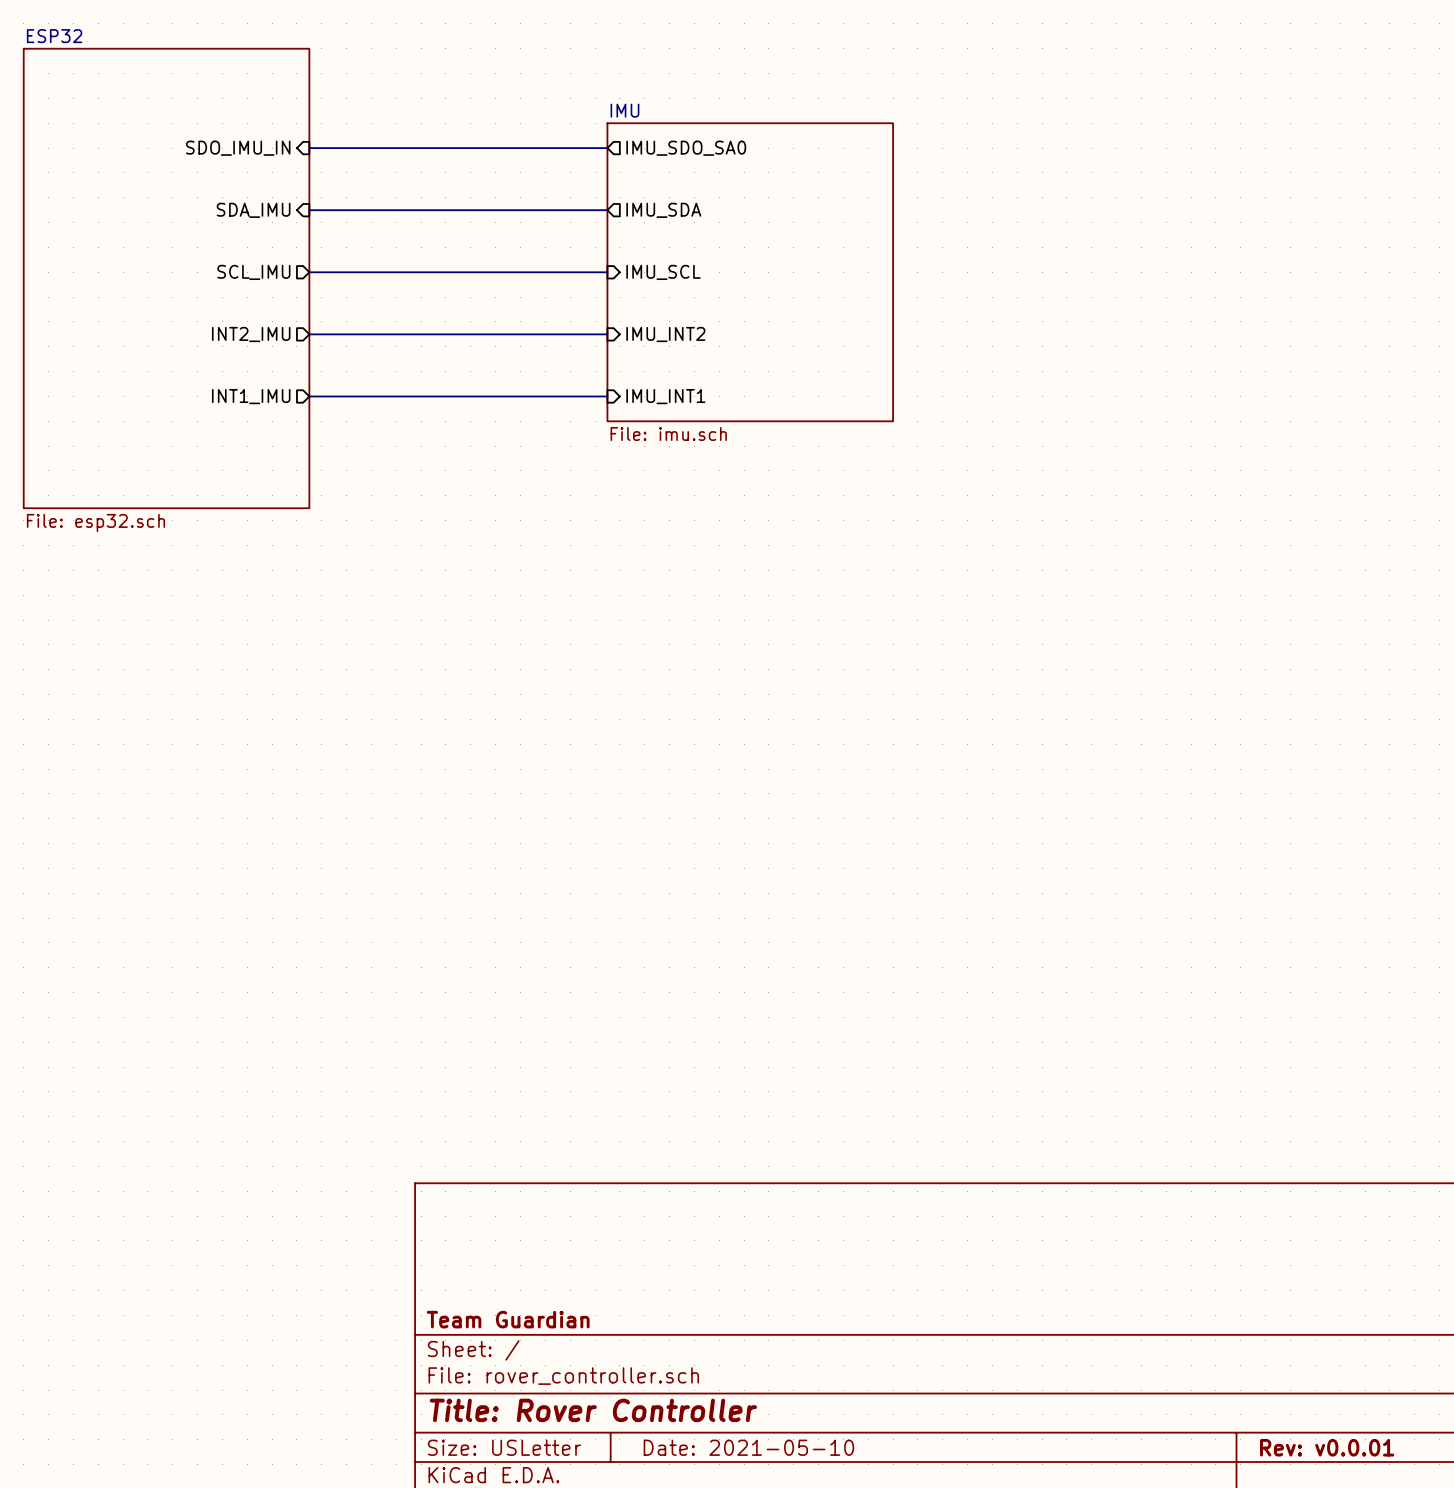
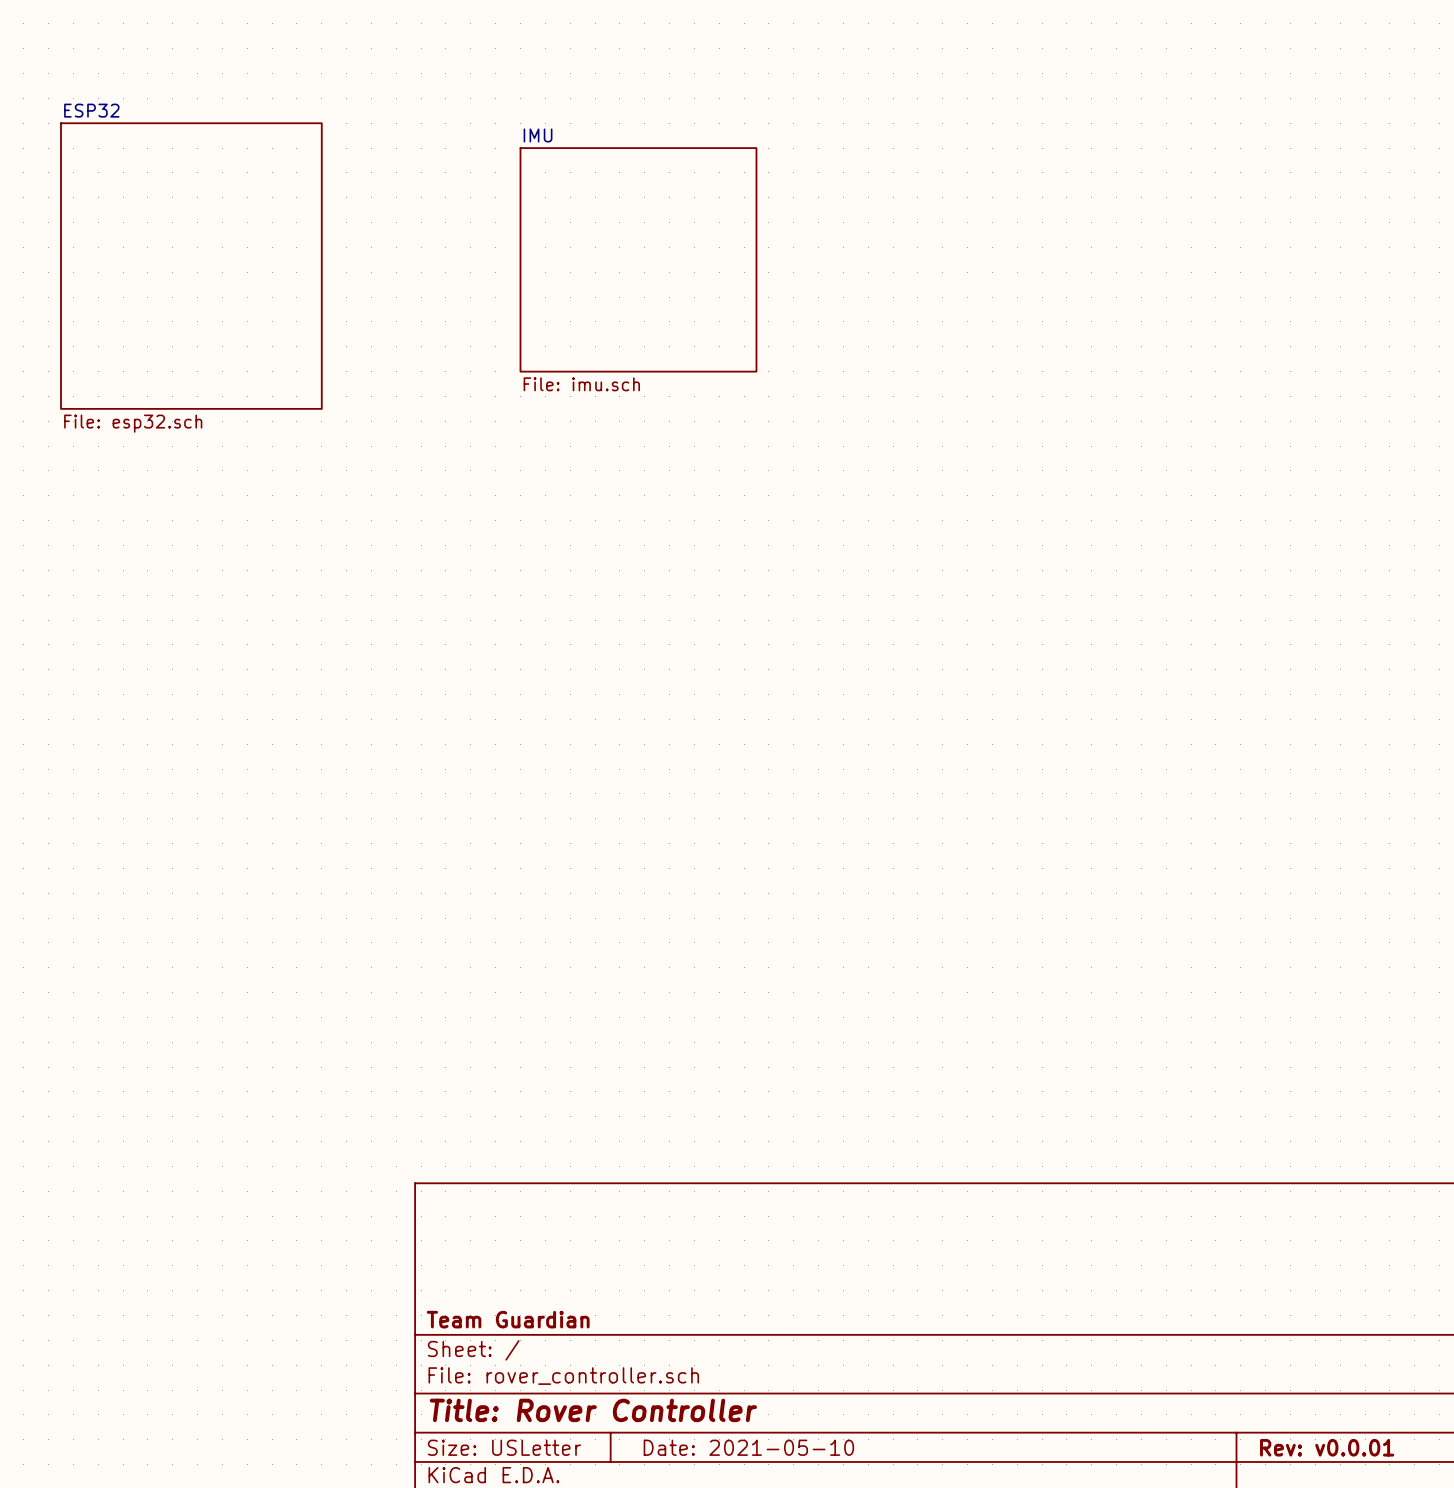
sheet ESP32 name position: ESP32 (54, 36) -> ESP32 (91, 110)
sheet ESP32 shape: [23, 48, 310, 509] -> [60, 123, 322, 409]
sheet pin: SDO_IMU_IN (238, 148) -> none
wire: (309, 148) (607, 148) -> none
sheet pin: IMU_SDO_SA0 (686, 148) -> none
sheet pin: SDA_IMU (253, 210) -> none
wire: (309, 210) (607, 210) -> none
sheet pin: IMU_SDA (663, 210) -> none
sheet IMU: none -> File: imu.sch (638, 259)
sheet pin: SCL_IMU (253, 272) -> none
wire: (309, 272) (607, 272) -> none
sheet pin: IMU_SCL (663, 272) -> none
sheet IMU: File: imu.sch (750, 272) -> none
sheet pin: INT2_IMU (251, 334) -> none
wire: (309, 334) (607, 334) -> none
sheet pin: IMU_INT2 (665, 334) -> none
sheet pin: INT1_IMU (251, 396) -> none
wire: (309, 396) (607, 396) -> none
sheet pin: IMU_INT1 (665, 396) -> none
sheet ESP32 value position: File: esp32.sch (95, 522) -> File: esp32.sch (133, 423)

